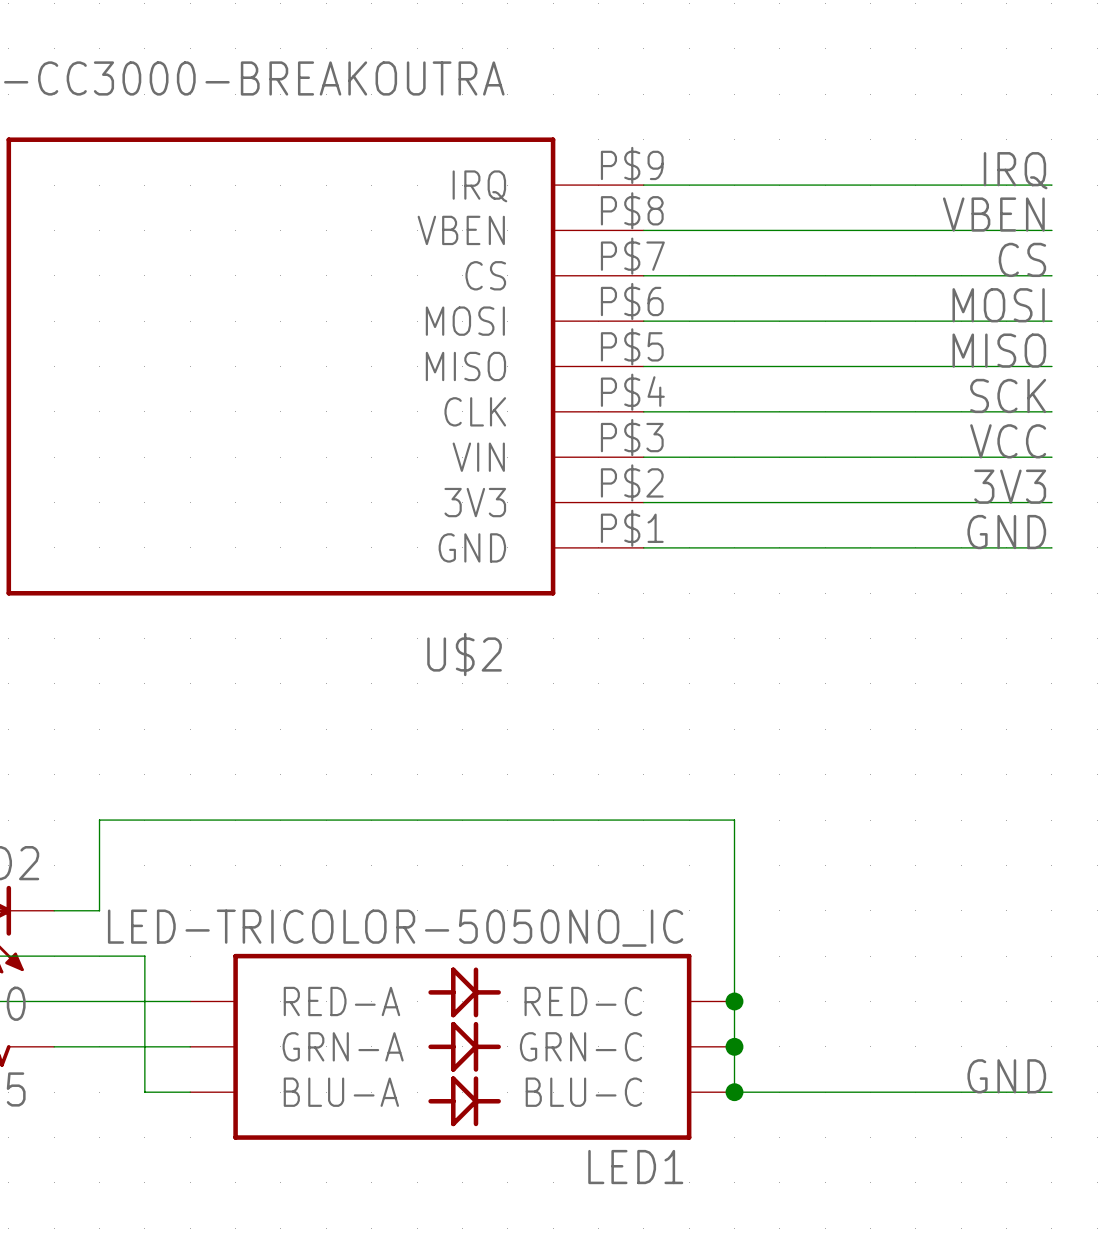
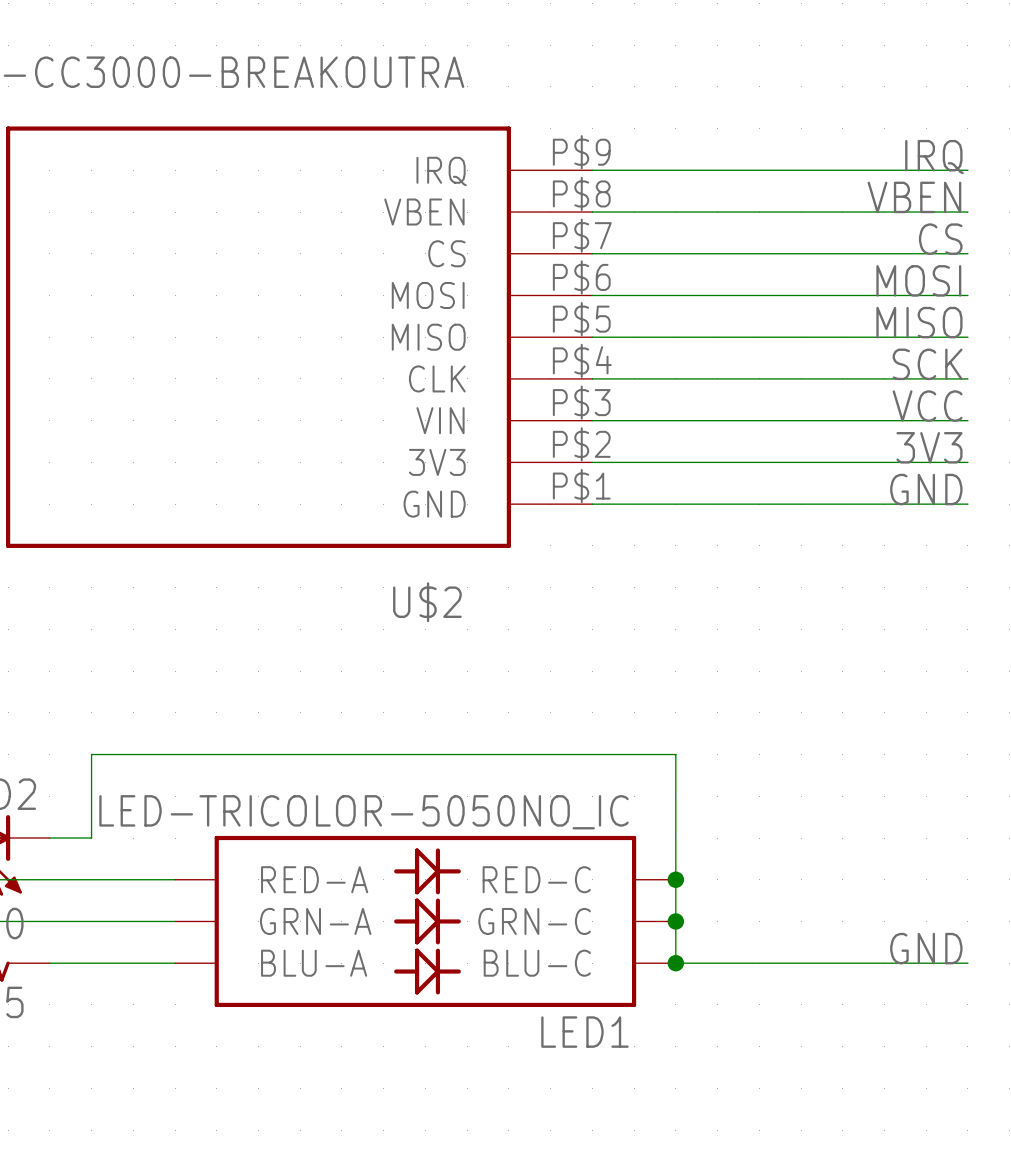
wire: (144, 956) (144, 1092) (190, 1092) -> (133, 879) (175, 879)
junction: none -> (675, 879)
LED1 position: (462, 1046) -> (425, 921)
wire: (734, 1046) (734, 1092) (1051, 1092) -> (675, 963) (967, 963)
label position: GND (1006, 1076) -> GND (926, 948)
junction: (734, 1092) -> none

